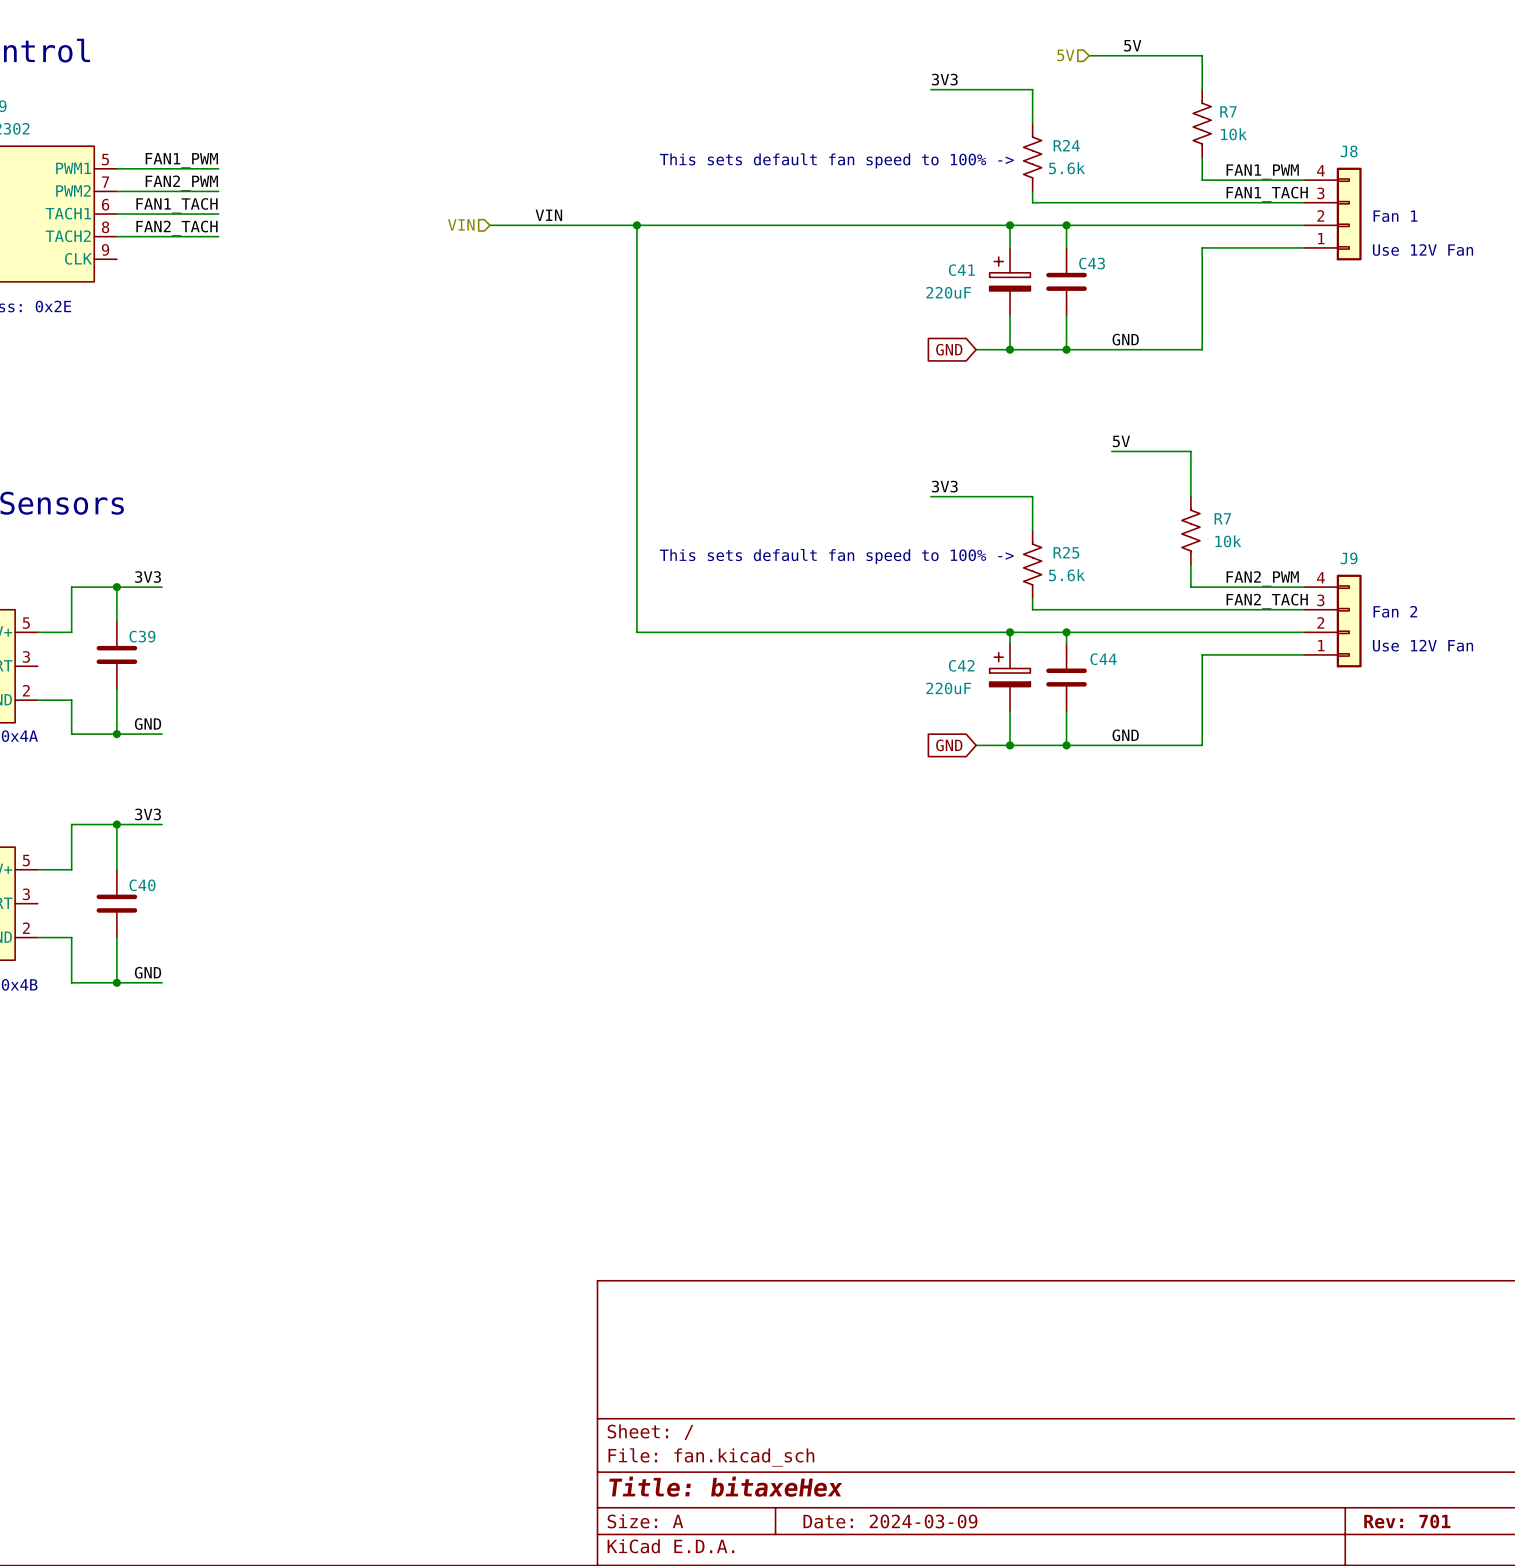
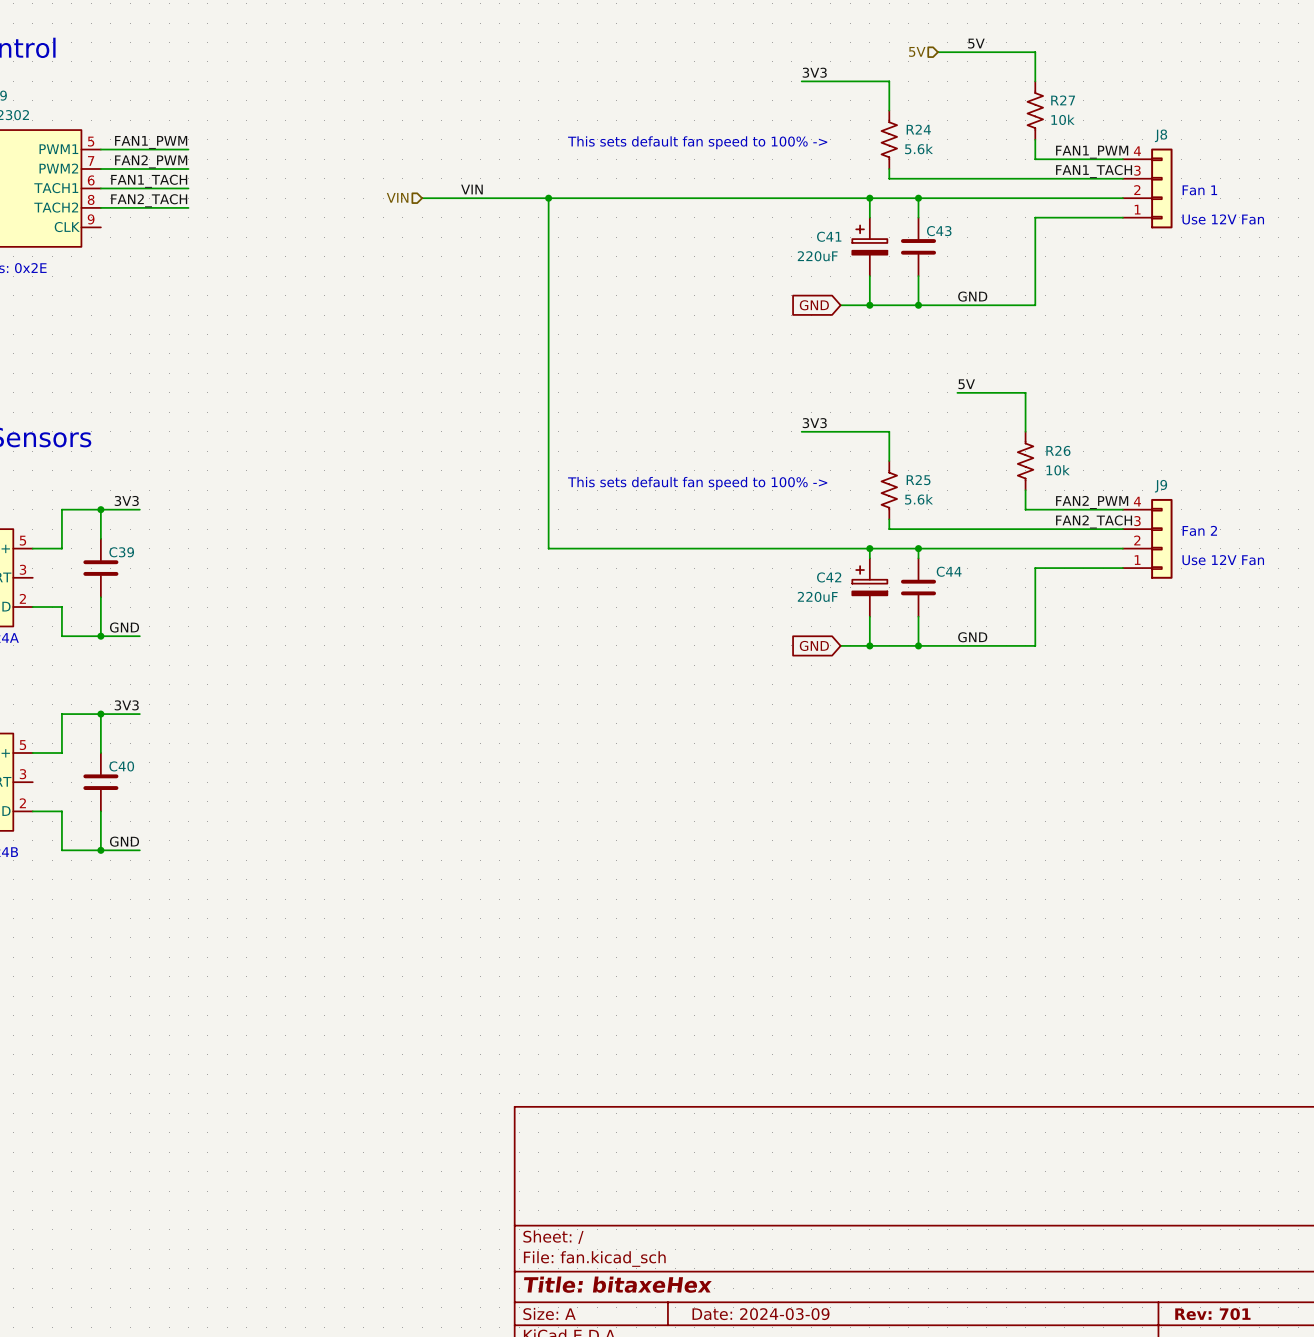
R7 name: R7 (1228, 111) -> R27 (1063, 100)
R7 name: R7 (1222, 518) -> R26 (1058, 450)

